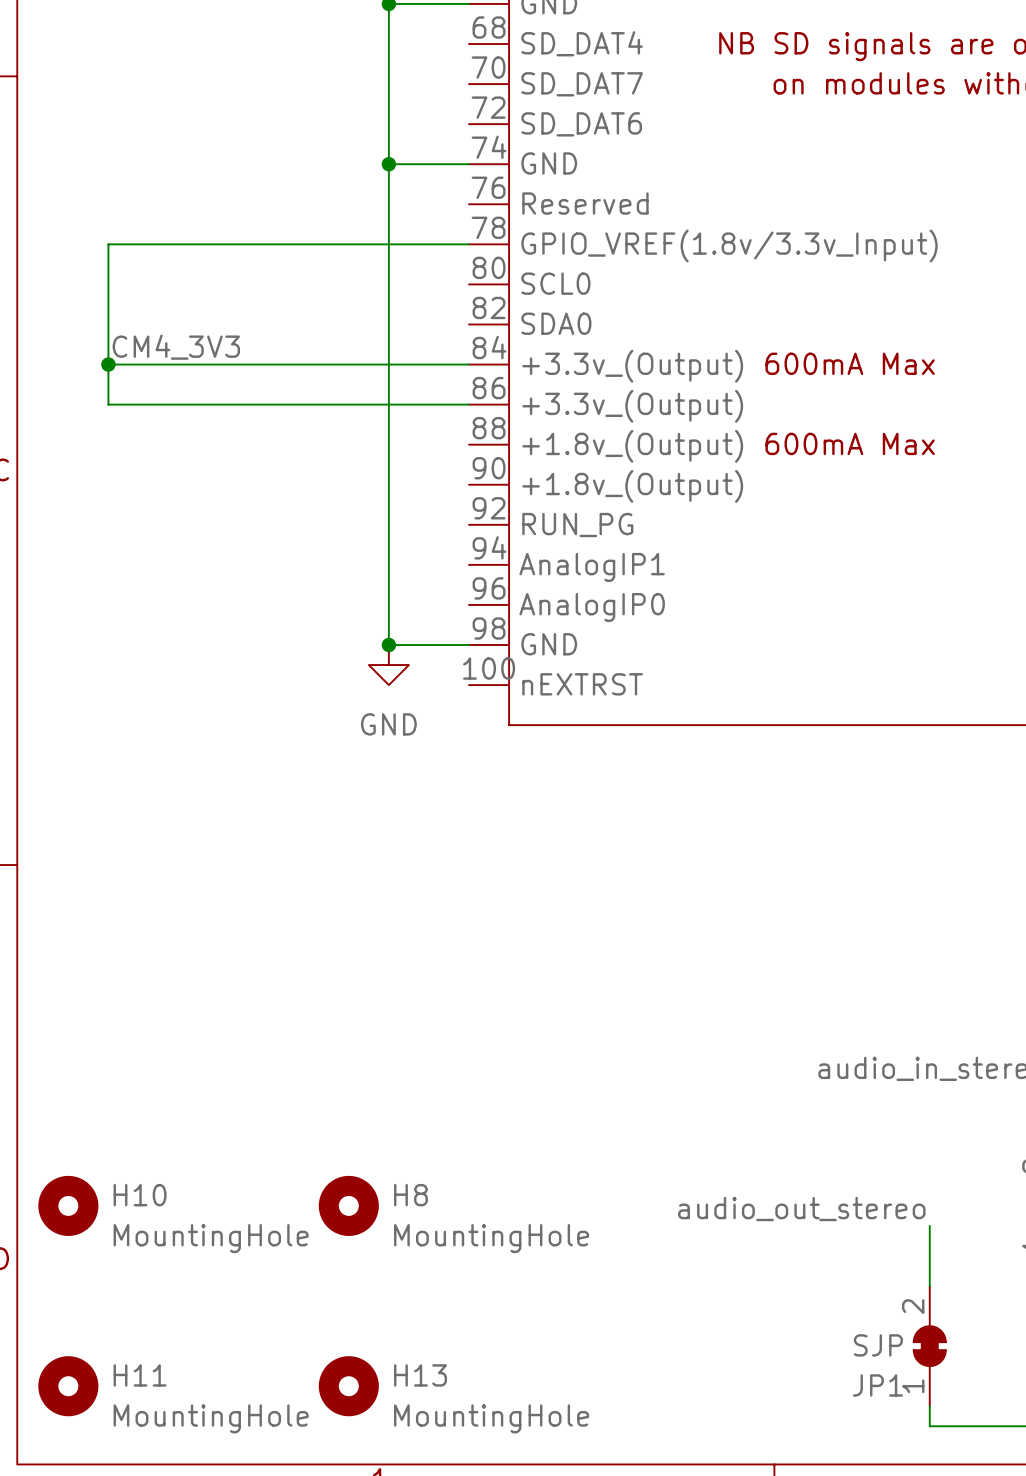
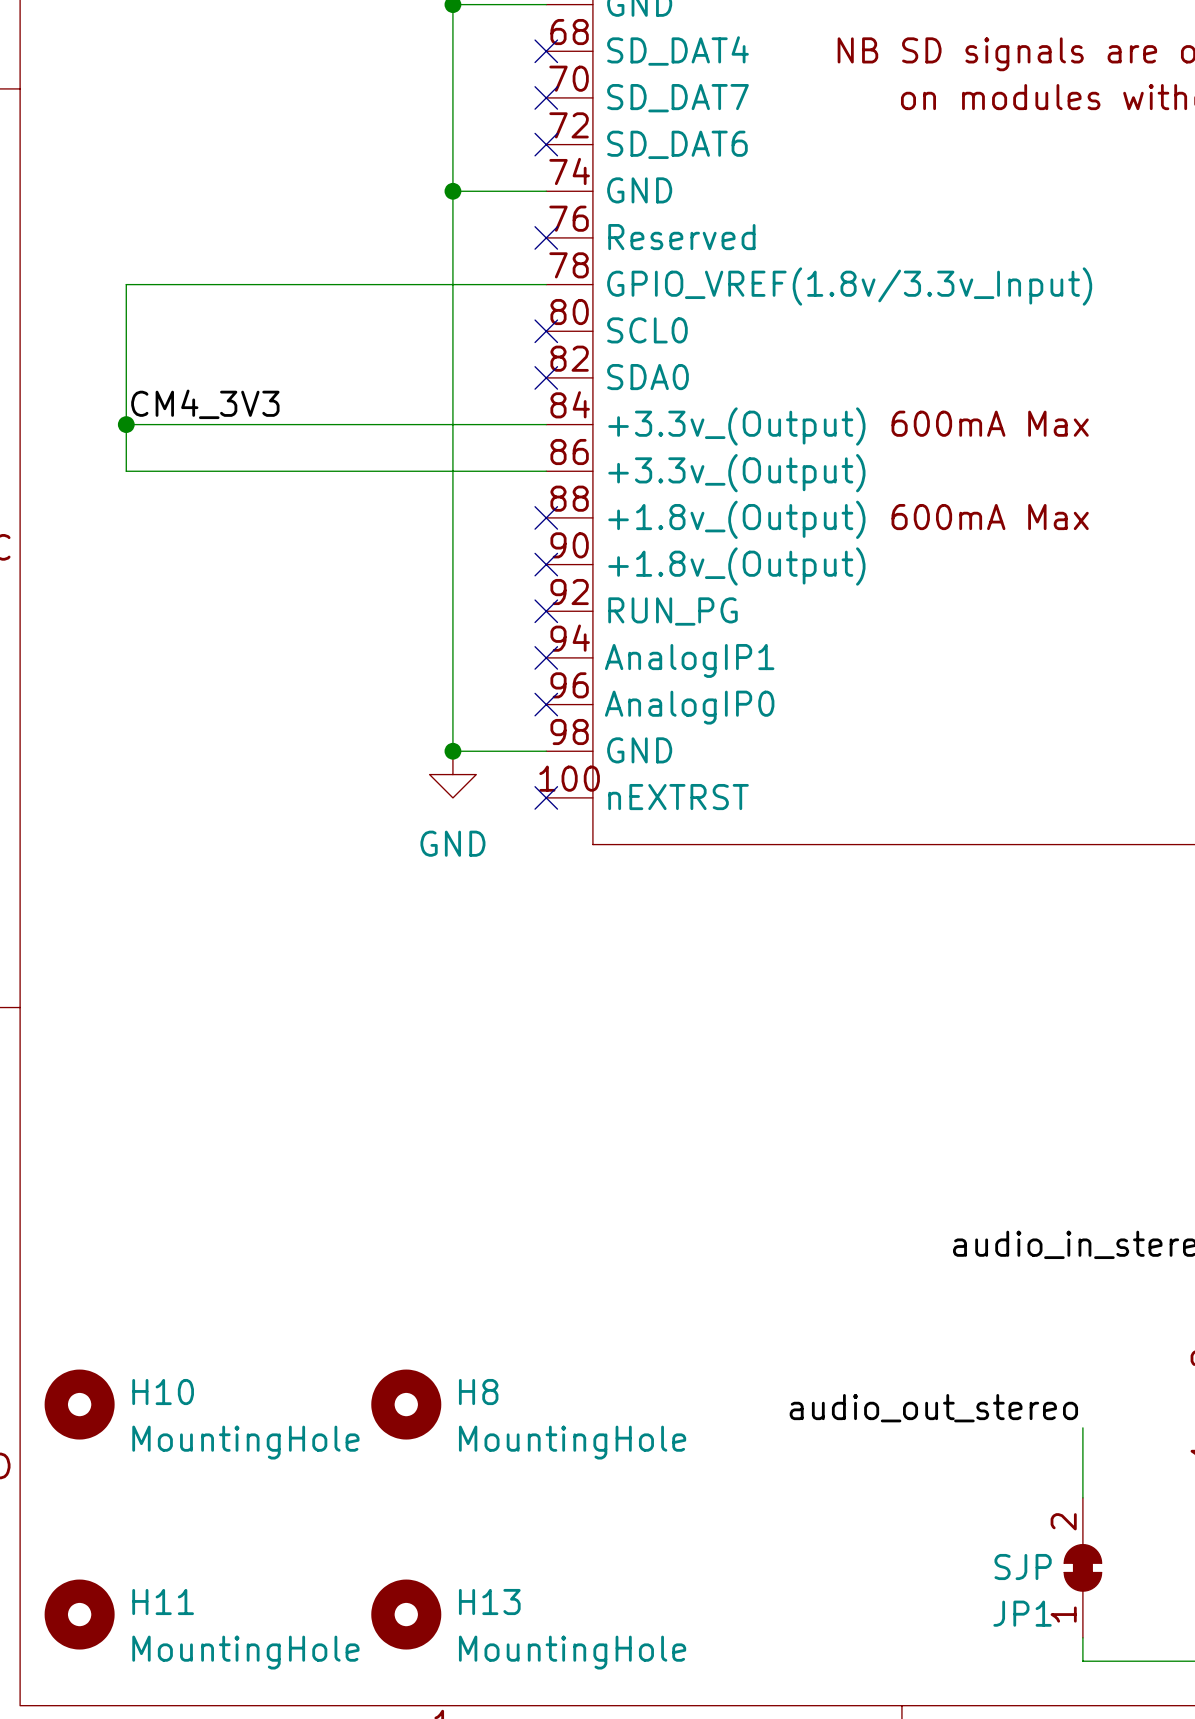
no-connect mark: none -> (546, 51)
no-connect mark: none -> (546, 97)
no-connect mark: none -> (546, 144)
no-connect mark: none -> (546, 237)
no-connect mark: none -> (546, 331)
no-connect mark: none -> (546, 377)
no-connect mark: none -> (546, 517)
no-connect mark: none -> (546, 564)
no-connect mark: none -> (546, 611)
no-connect mark: none -> (546, 657)
no-connect mark: none -> (546, 704)
no-connect mark: none -> (546, 797)

